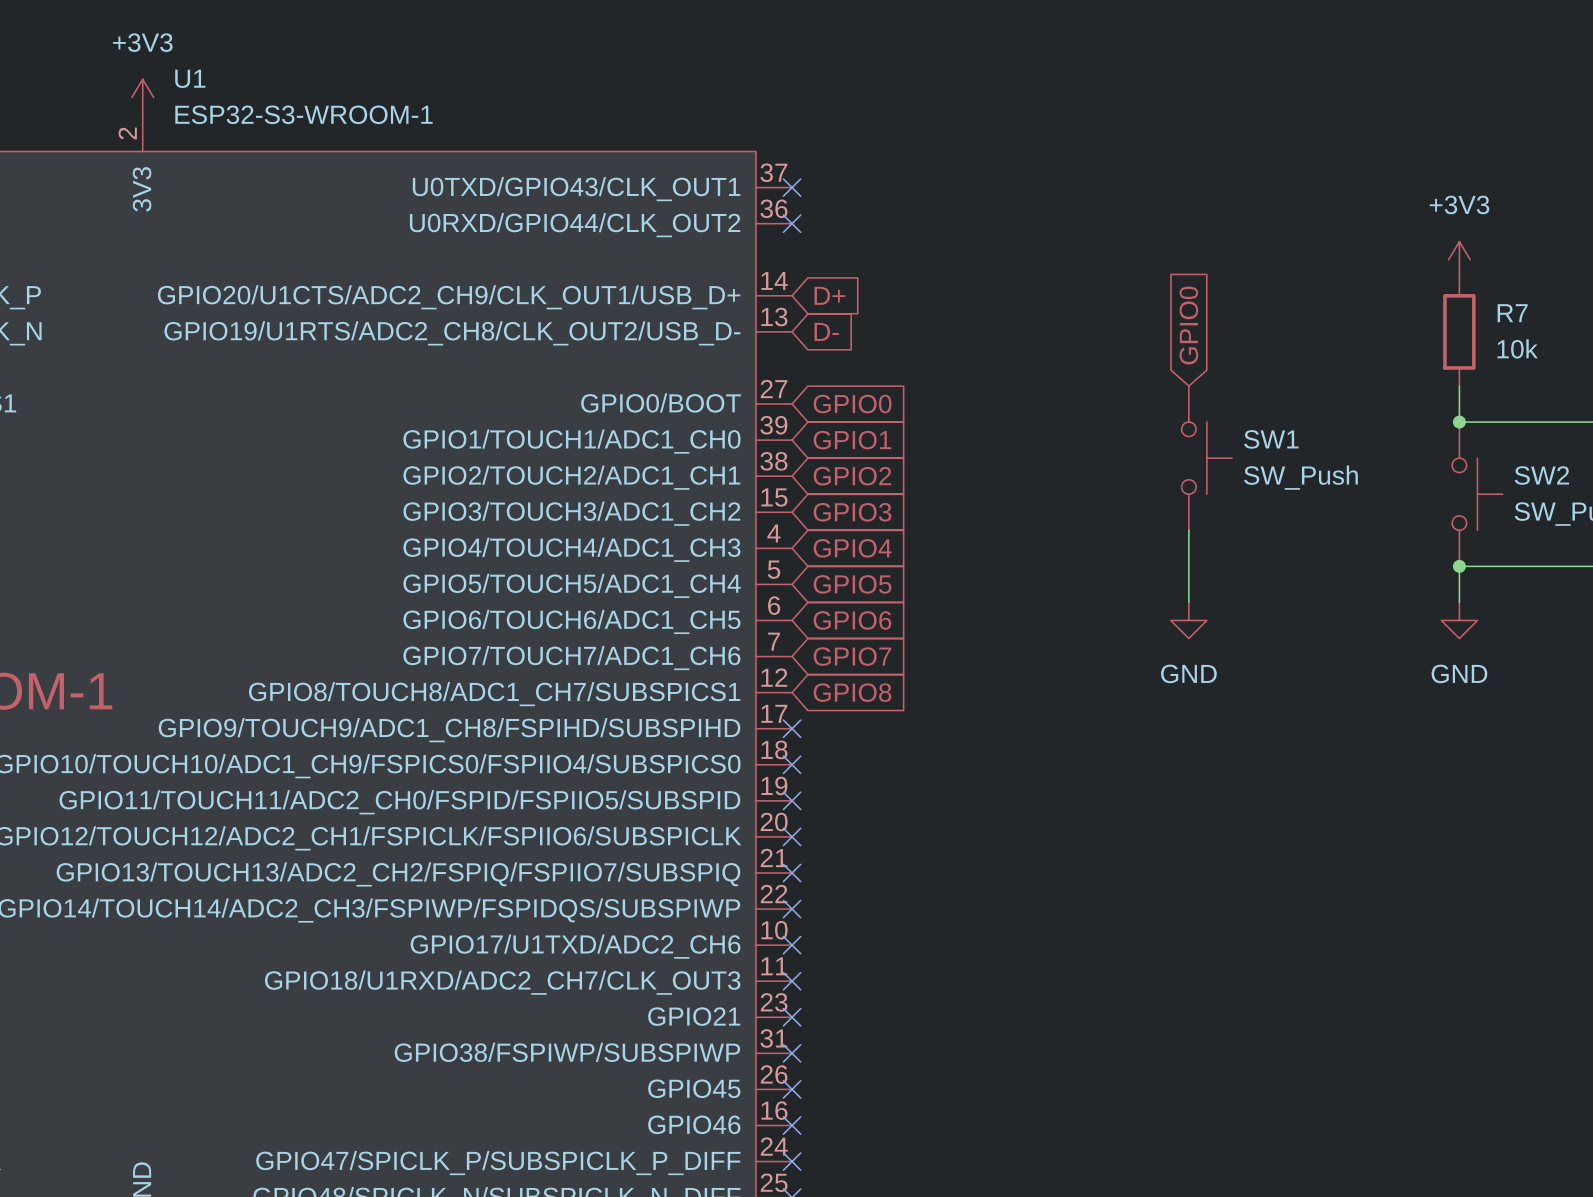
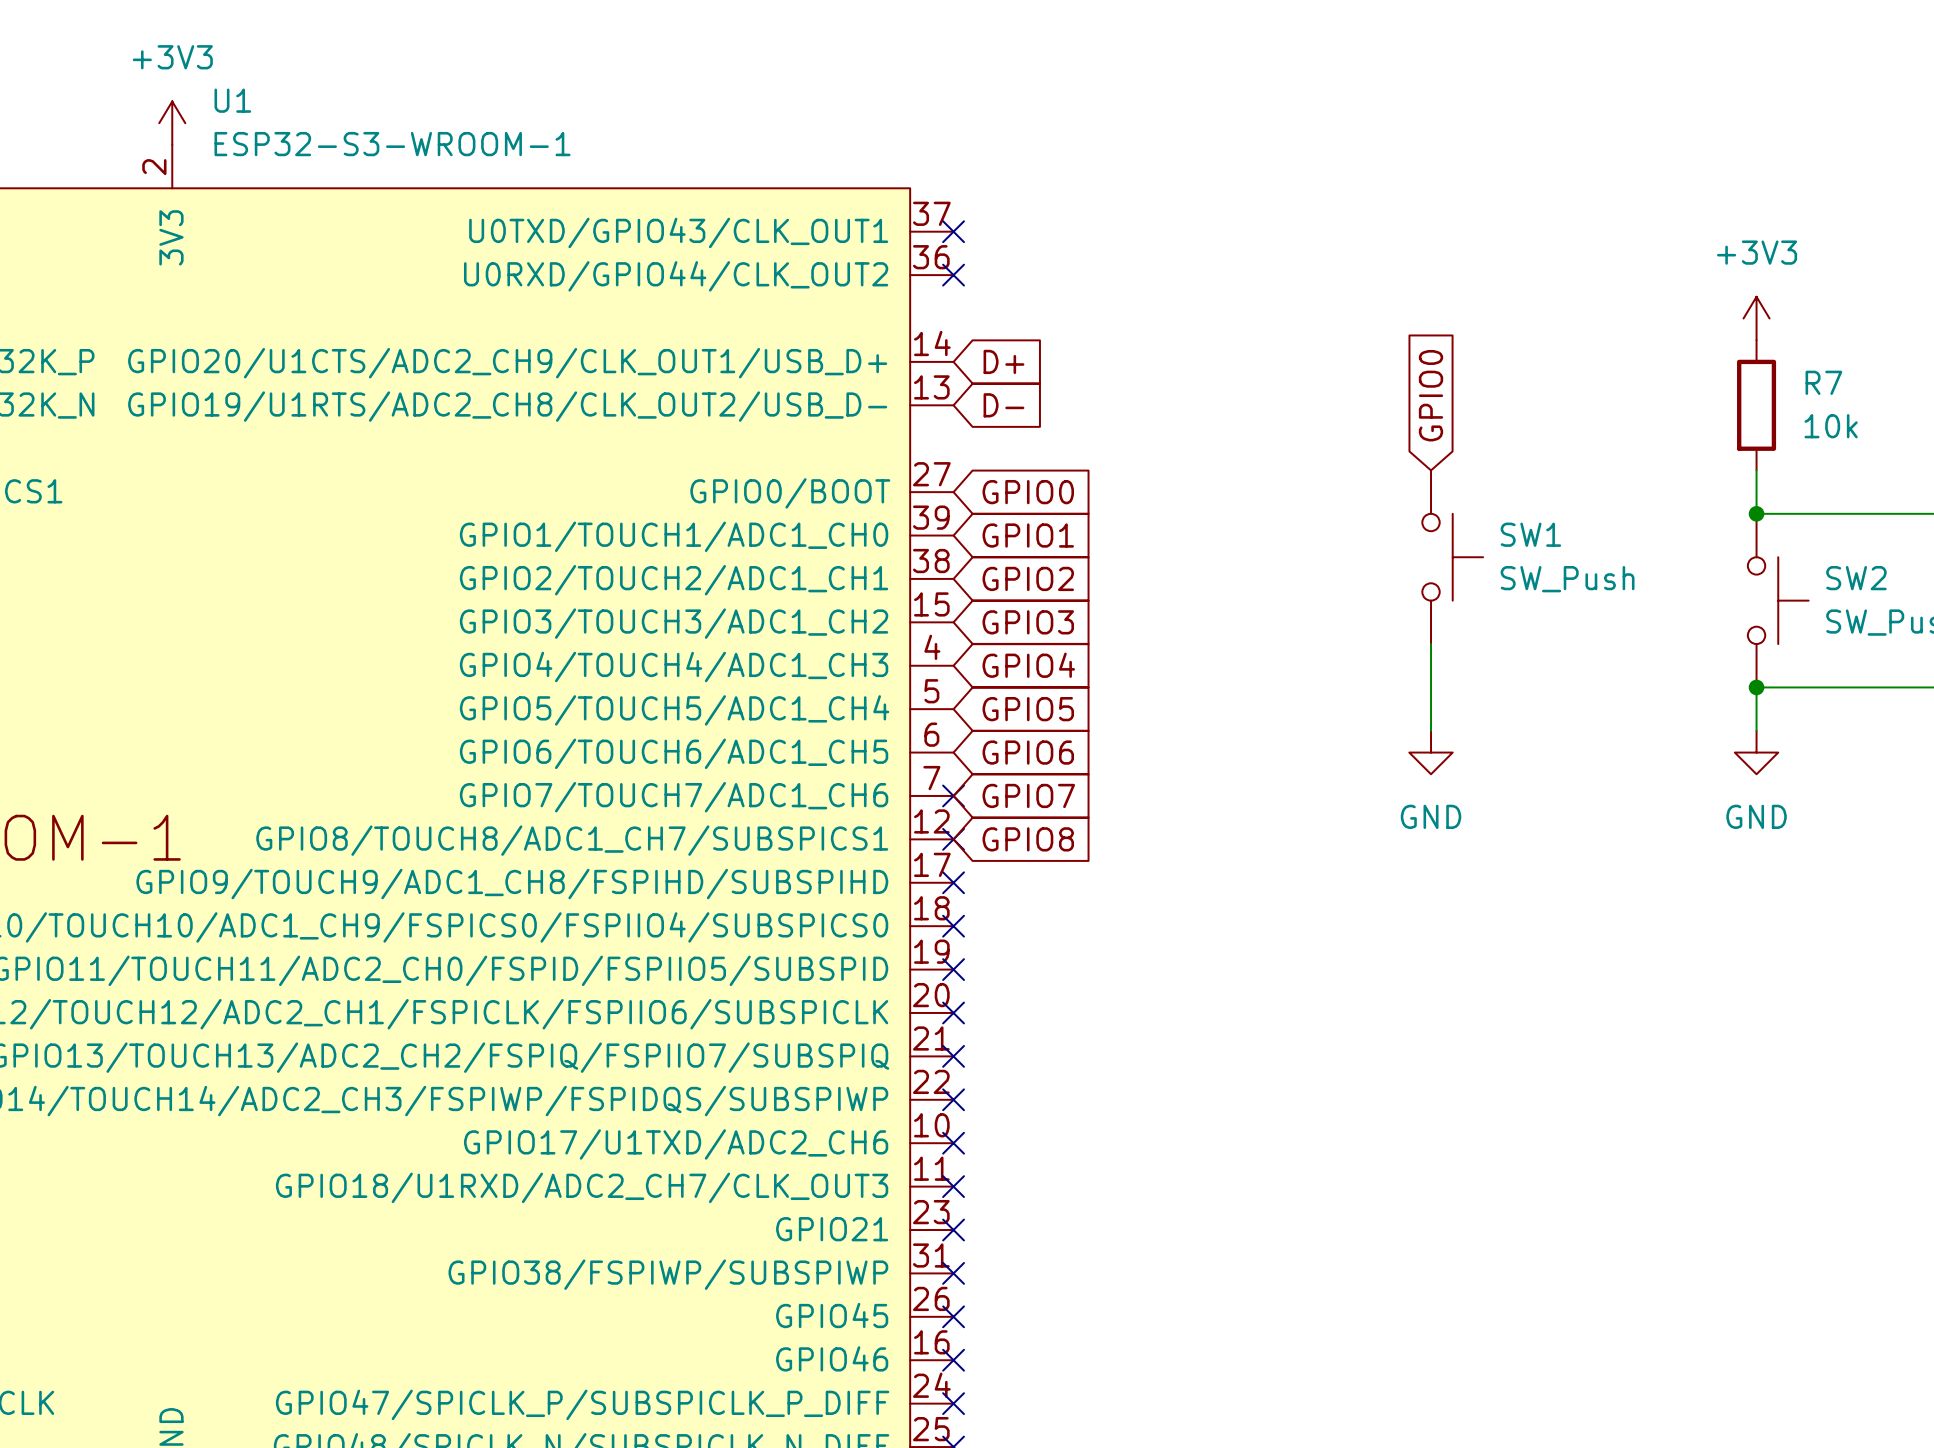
no-connect mark: none -> (953, 795)
no-connect mark: none -> (953, 839)

